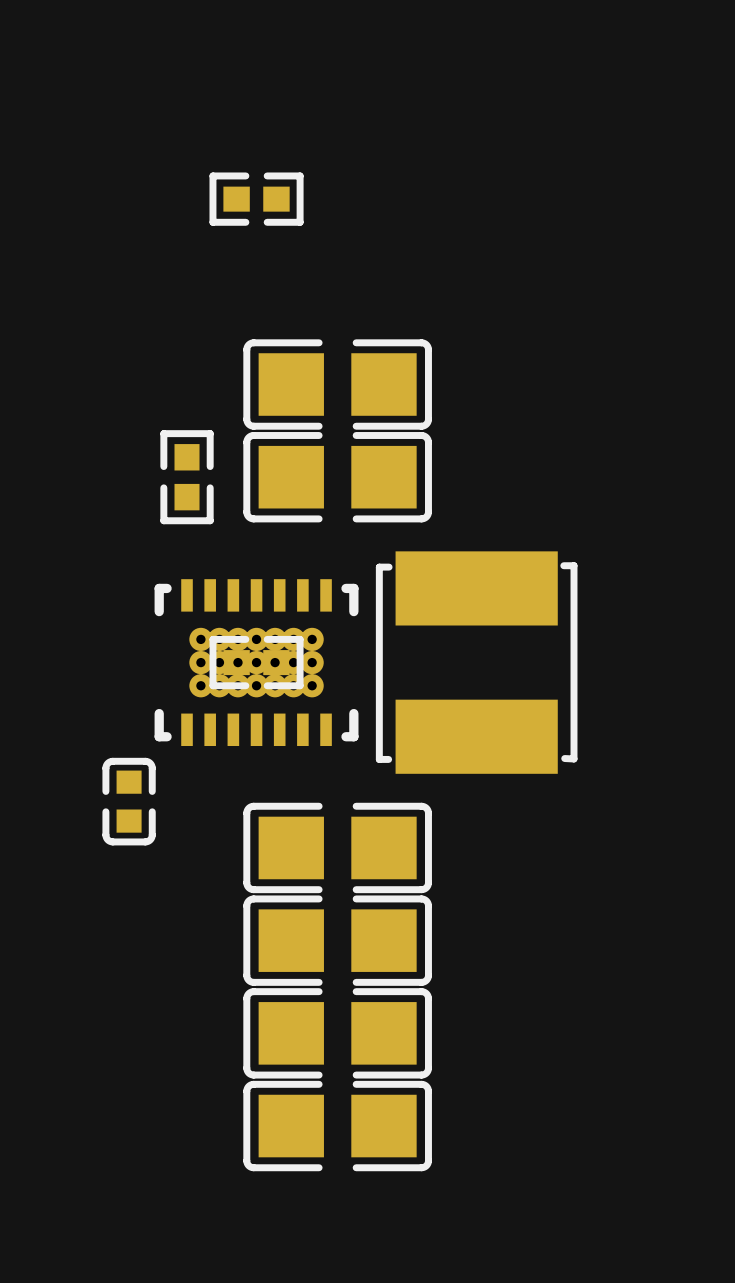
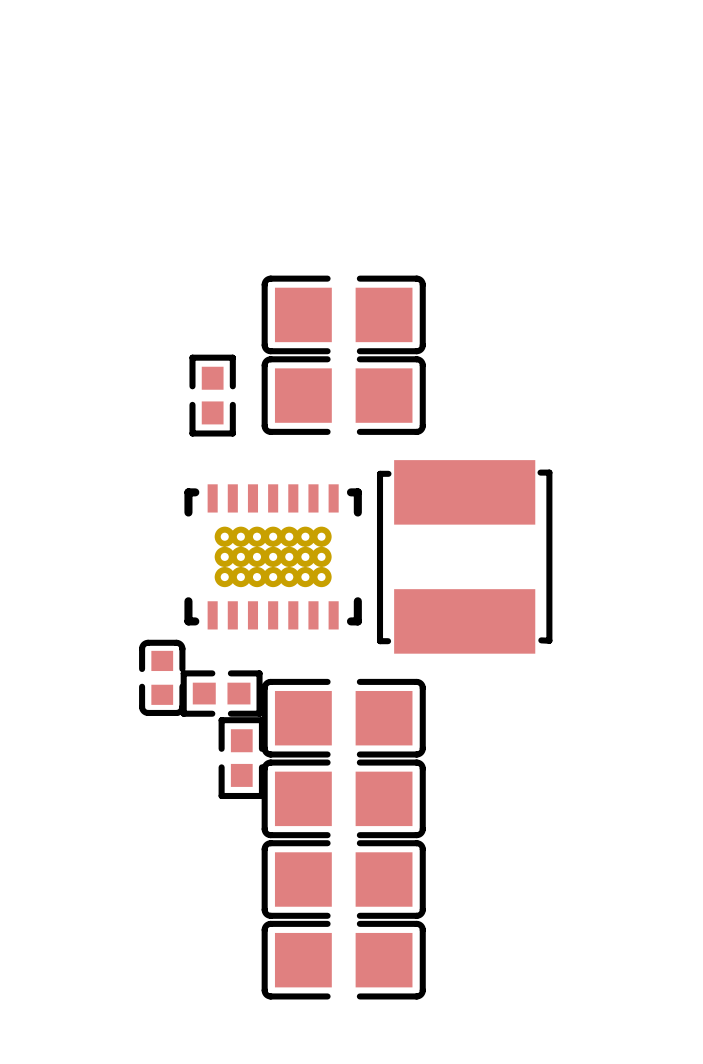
part: (256, 199) -> none
part: (256, 662) -> none
part: none -> (221, 693)
part: none -> (241, 758)

